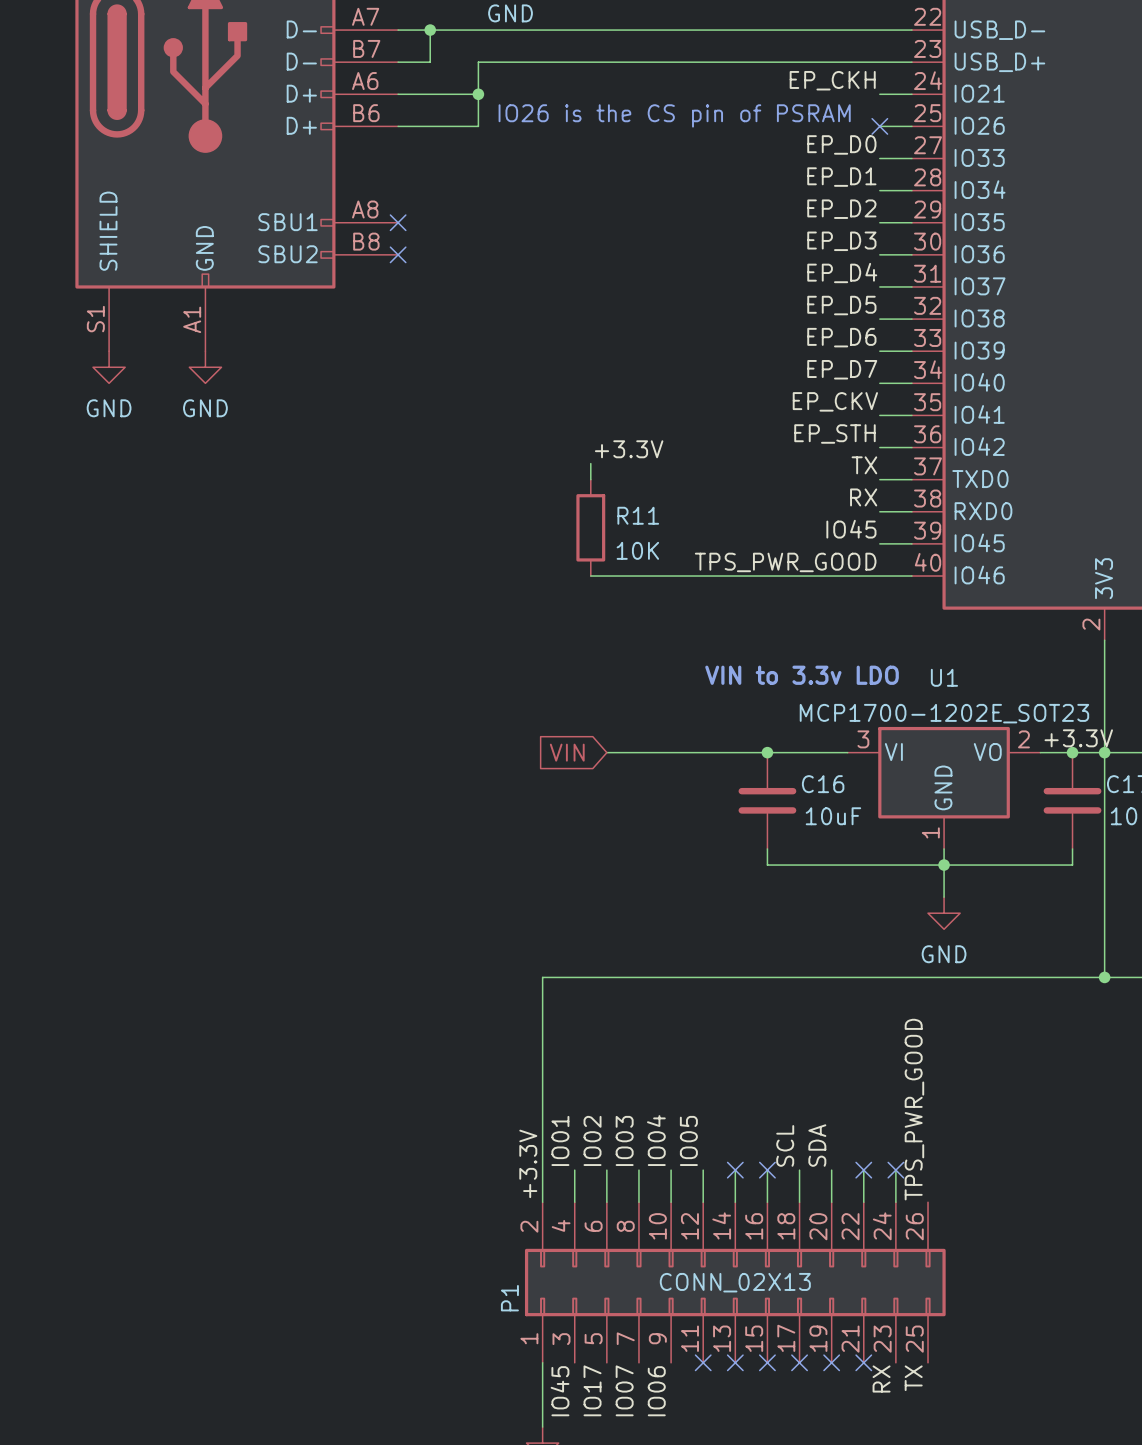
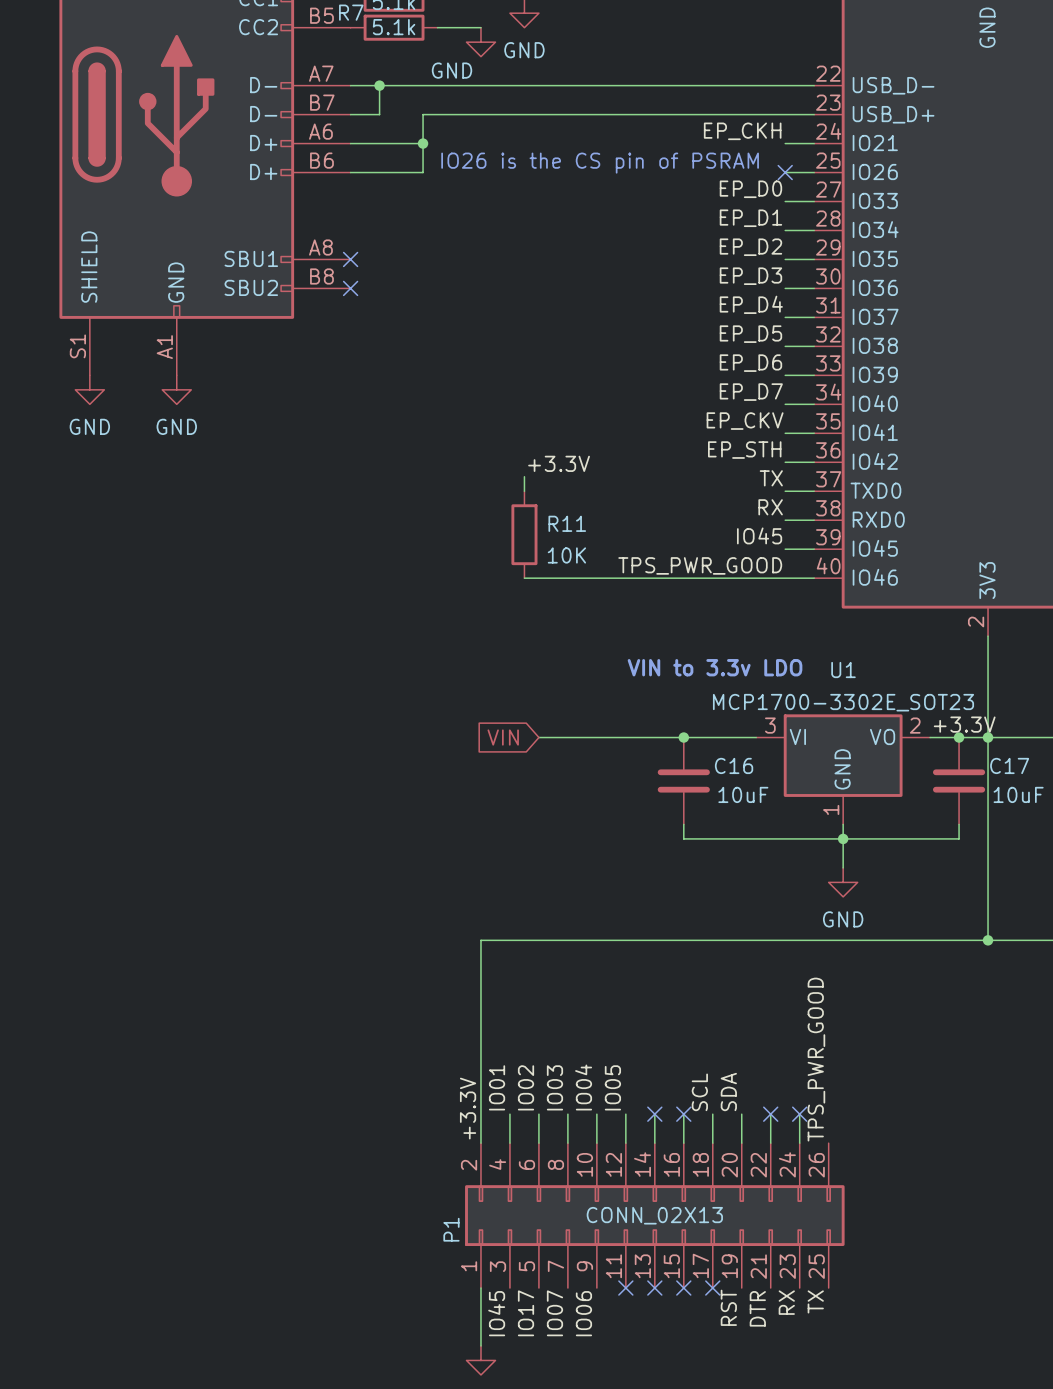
U1 value: MCP1700-1202E_SOT23 (944, 713) -> MCP1700-3302E_SOT23 (843, 702)
no-connect mark: (831, 1362) -> none
no-connect mark: (863, 1362) -> none
label: none -> RST (728, 1307)
label: none -> DTR (757, 1308)

